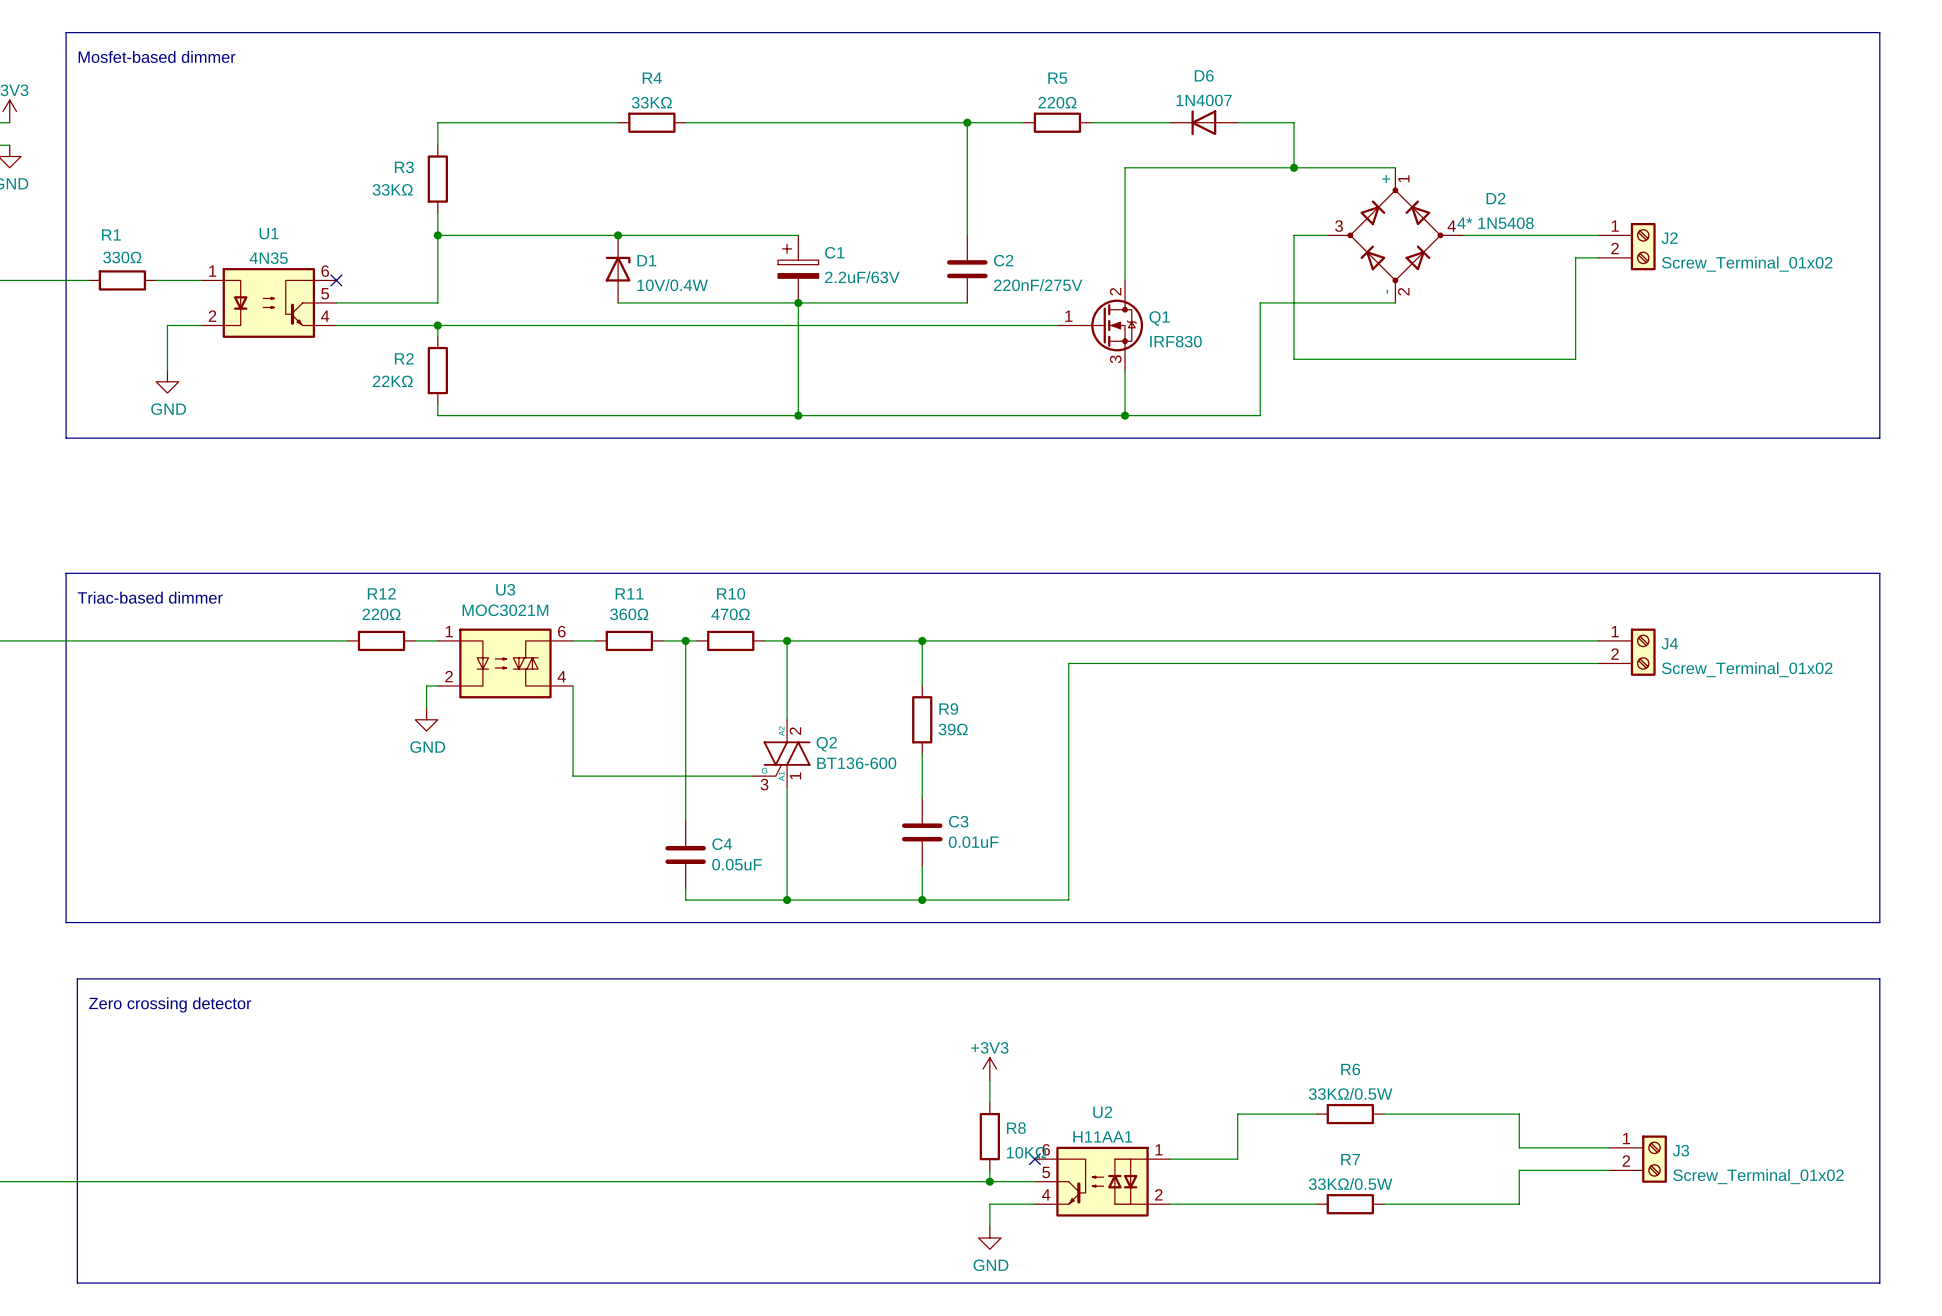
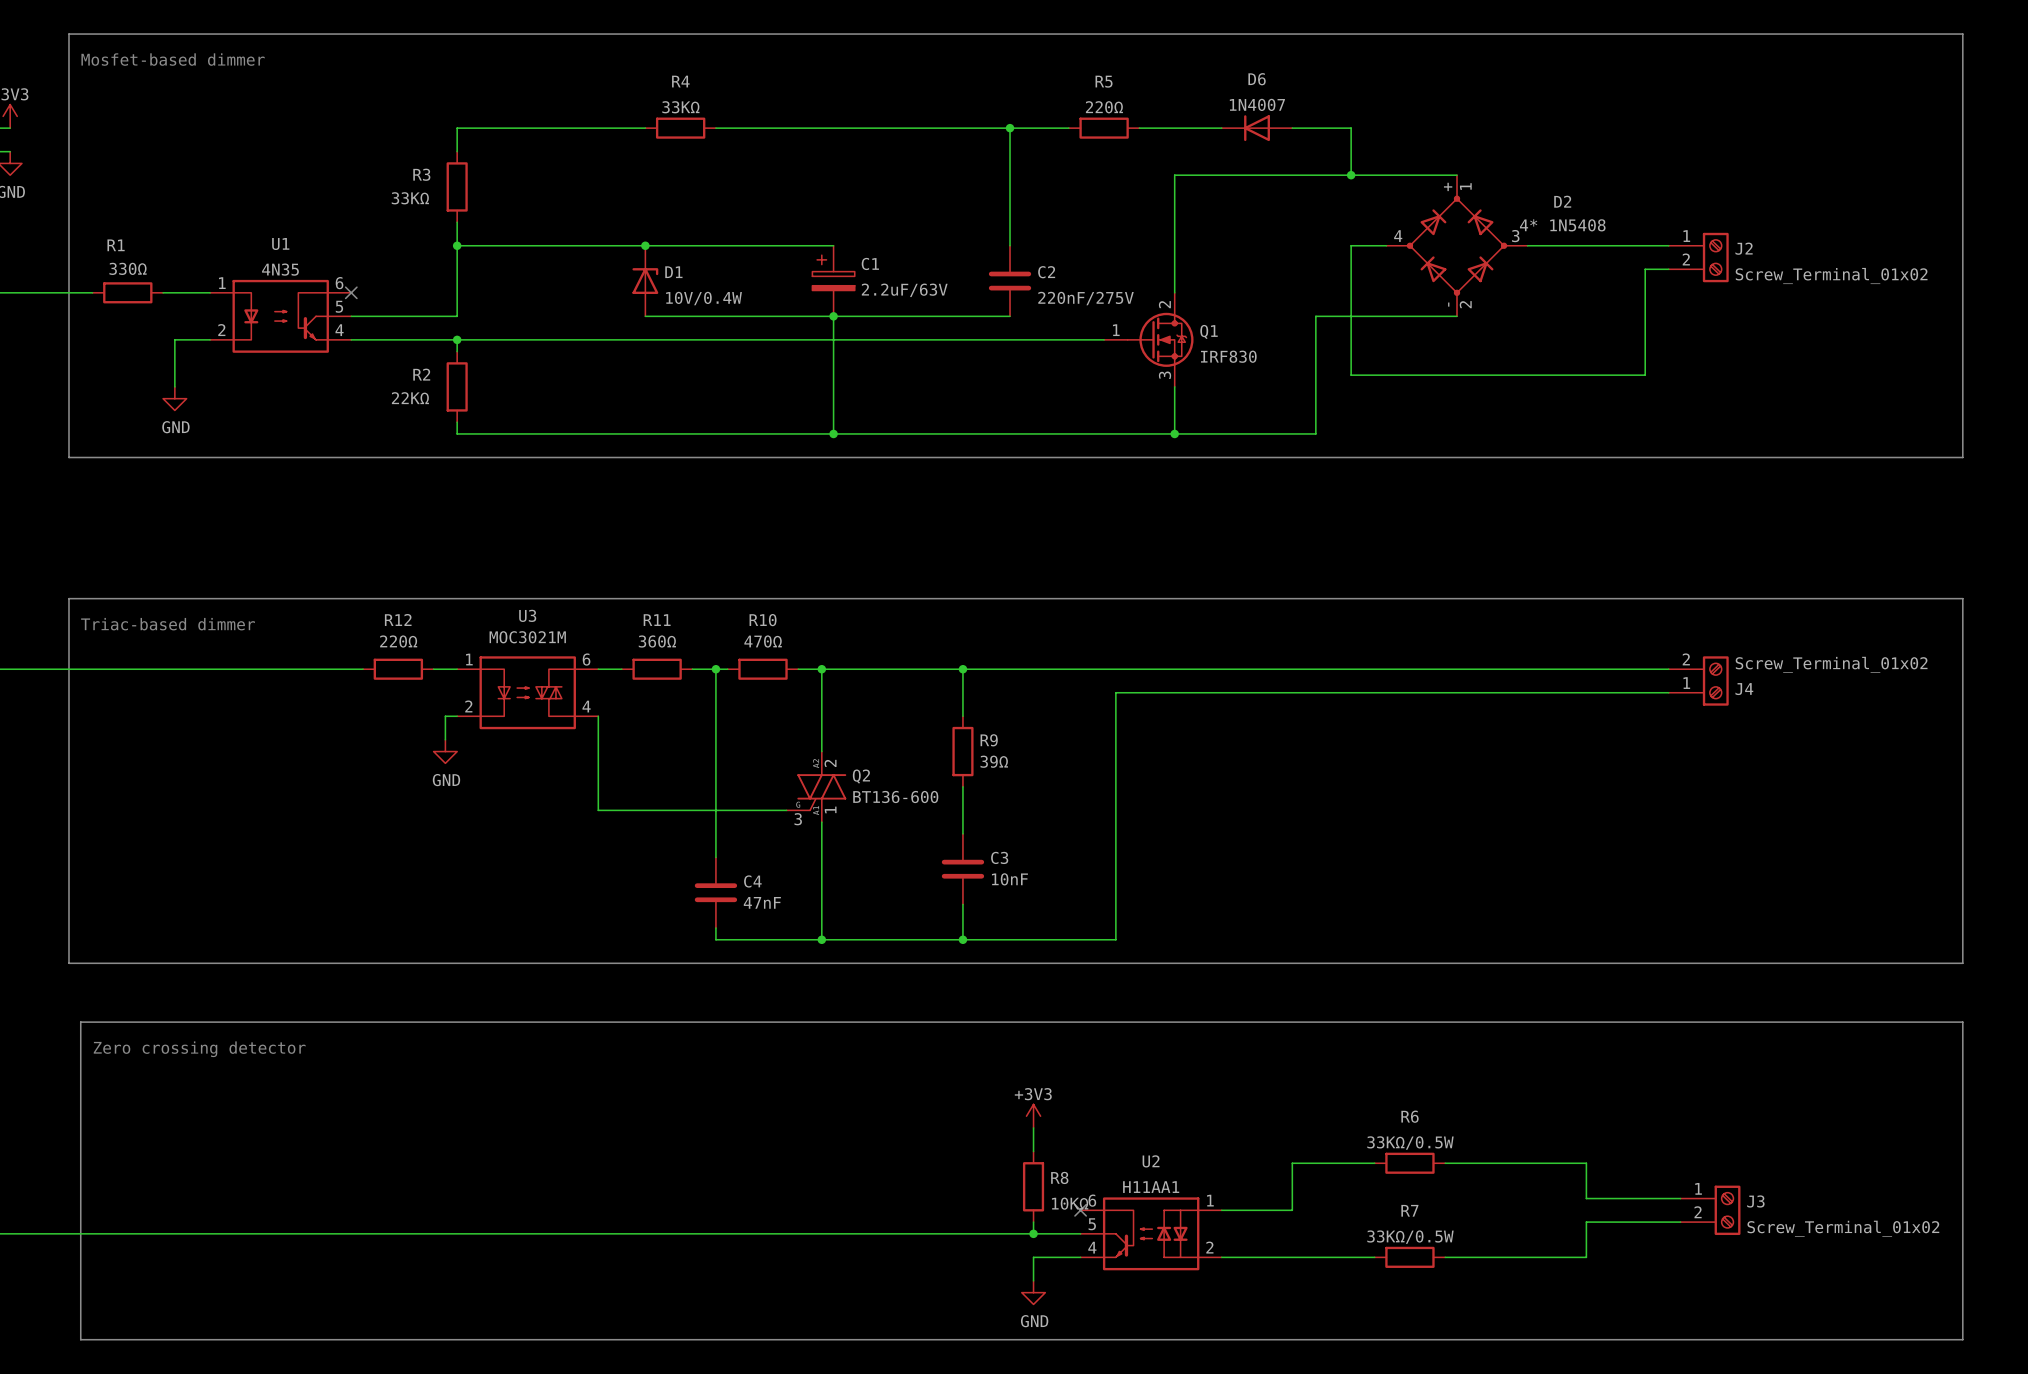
D2 flip: as is (1395, 235) -> left-right (1457, 245)
J4 flip: as is (1643, 652) -> up-down (1715, 680)
C3 value: 0.01uF (973, 842) -> 10nF (1009, 879)
C4 value: 0.05uF (737, 864) -> 47nF (762, 902)

